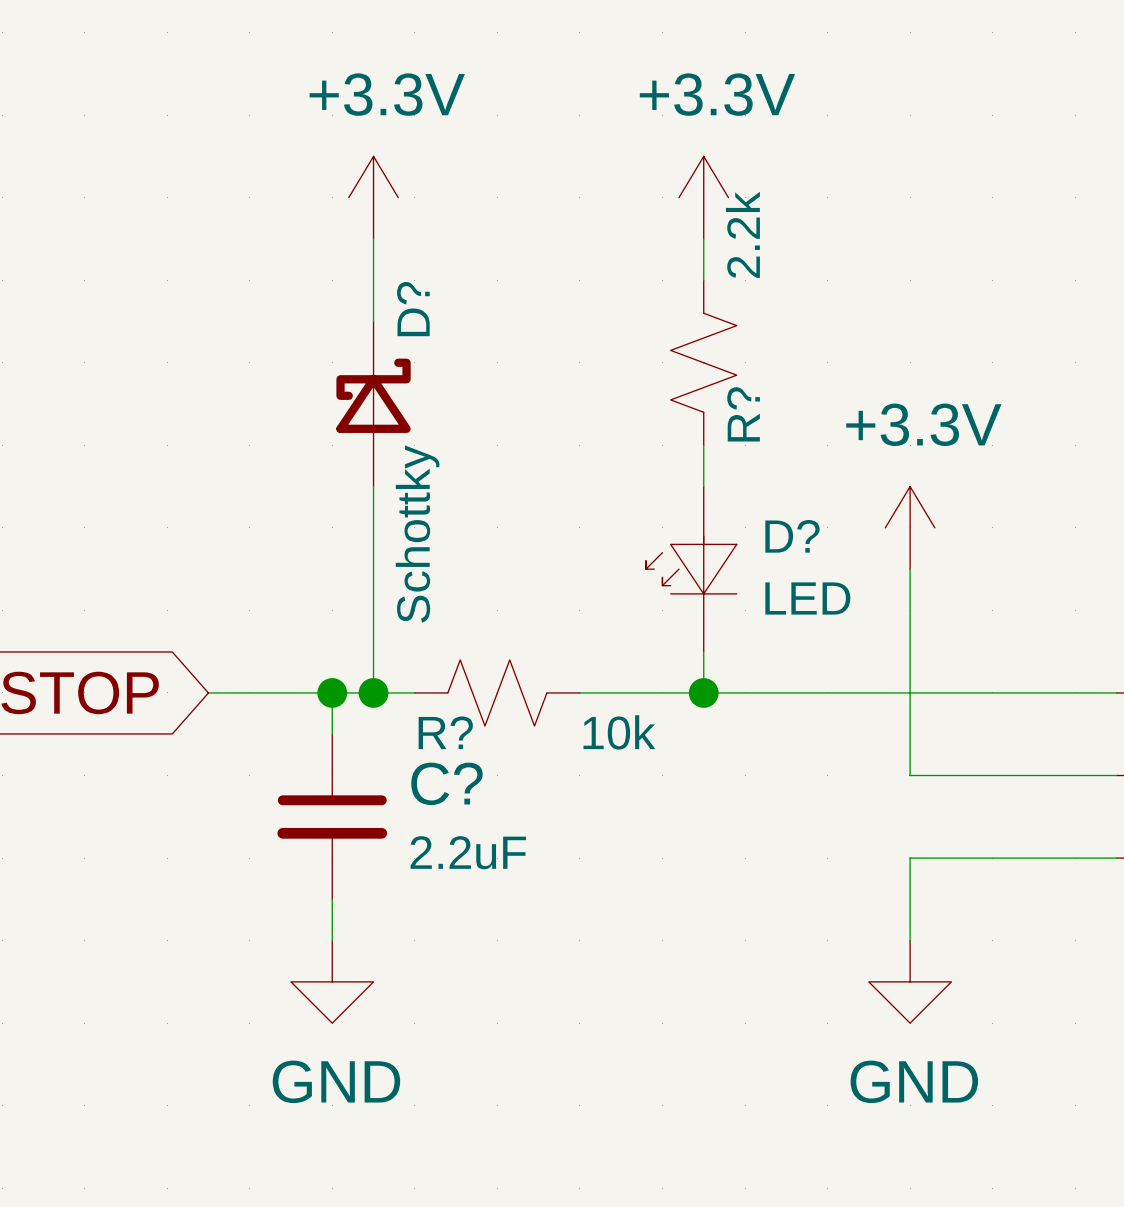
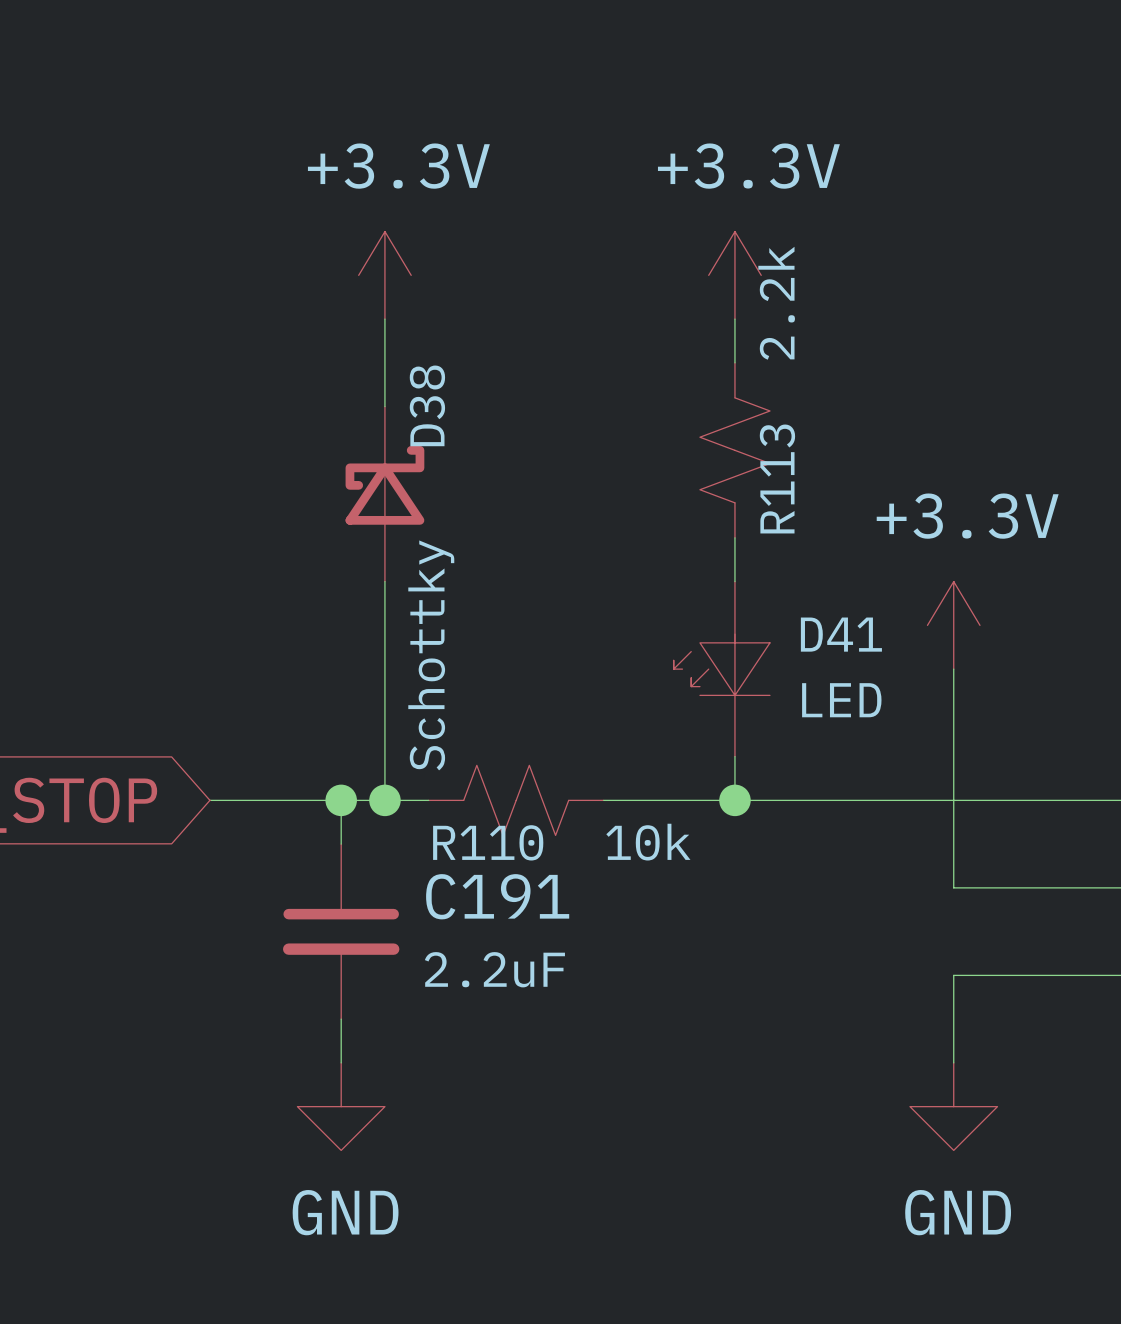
D? name: D? (413, 309) -> D38 (427, 405)
R? name: R? (743, 414) -> R113 (777, 478)
D? name: D? (792, 536) -> D41 (841, 634)
R? name: R? (445, 732) -> R110 (488, 842)
C? name: C? (446, 783) -> C191 (497, 896)

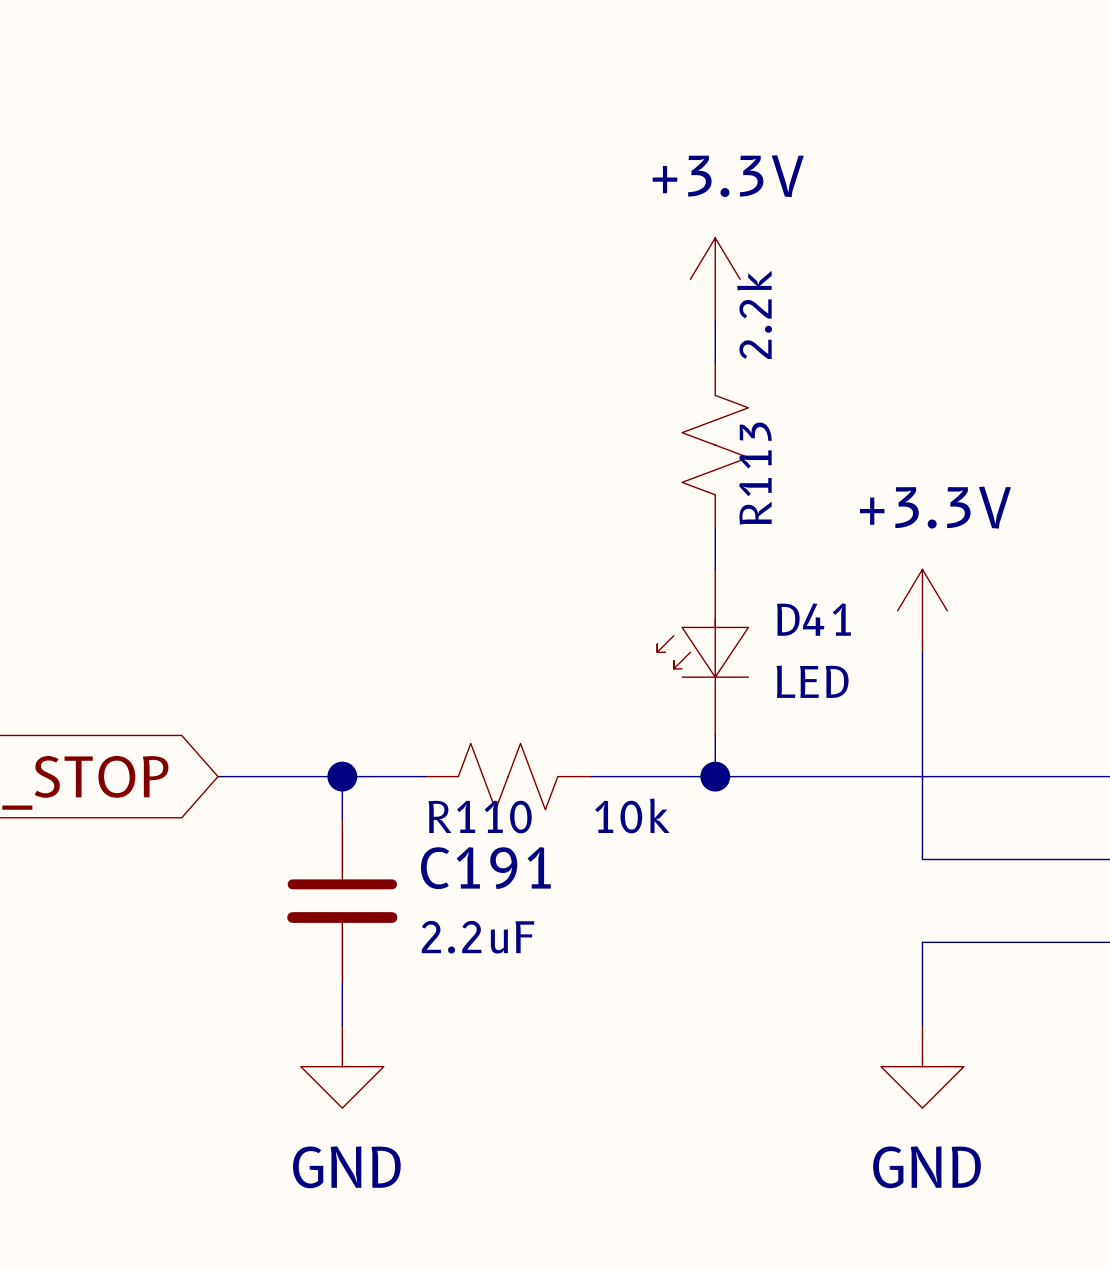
power symbol: +3.3V (384, 275) -> none
wire: (384, 319) (384, 406) -> none
D38: Schottky (384, 494) -> none
wire: (384, 581) (384, 800) -> none
junction: (384, 800) -> none

